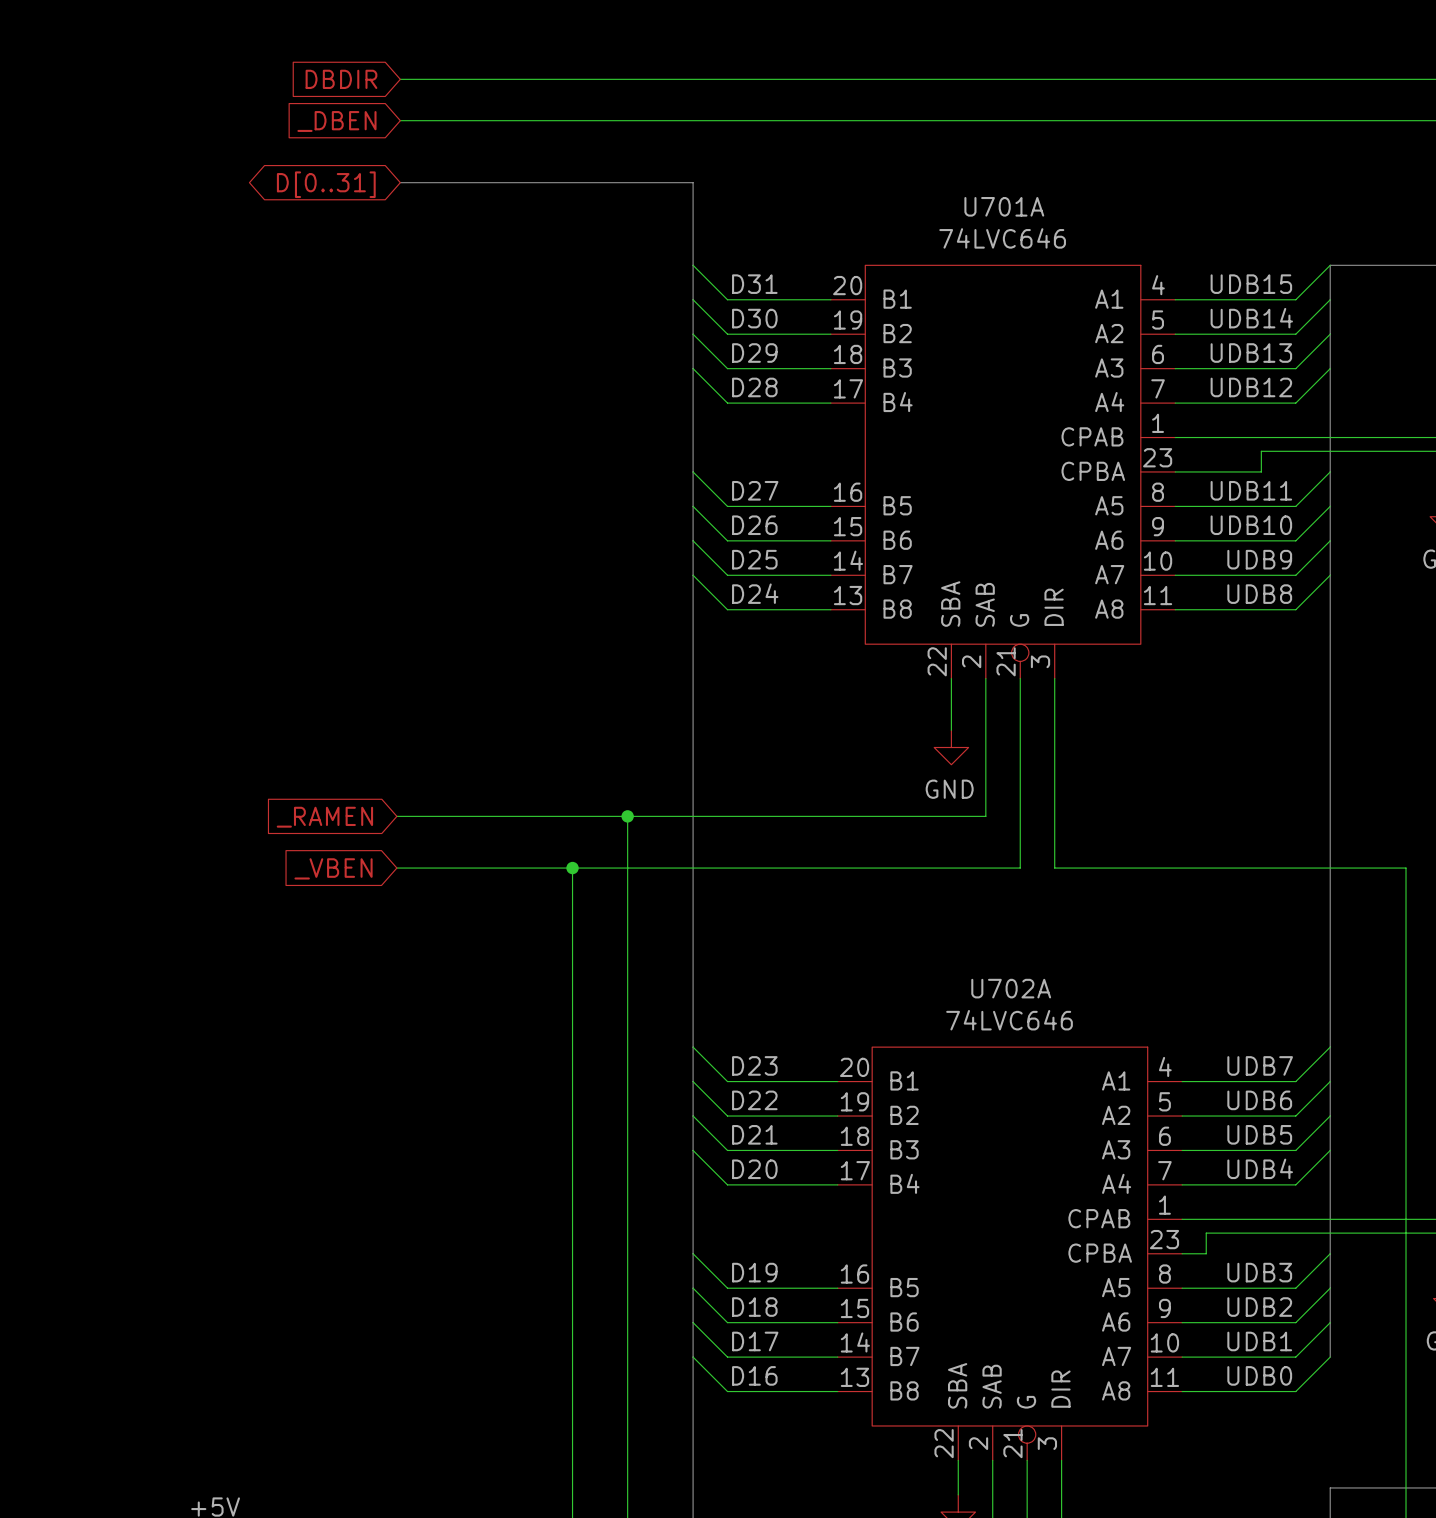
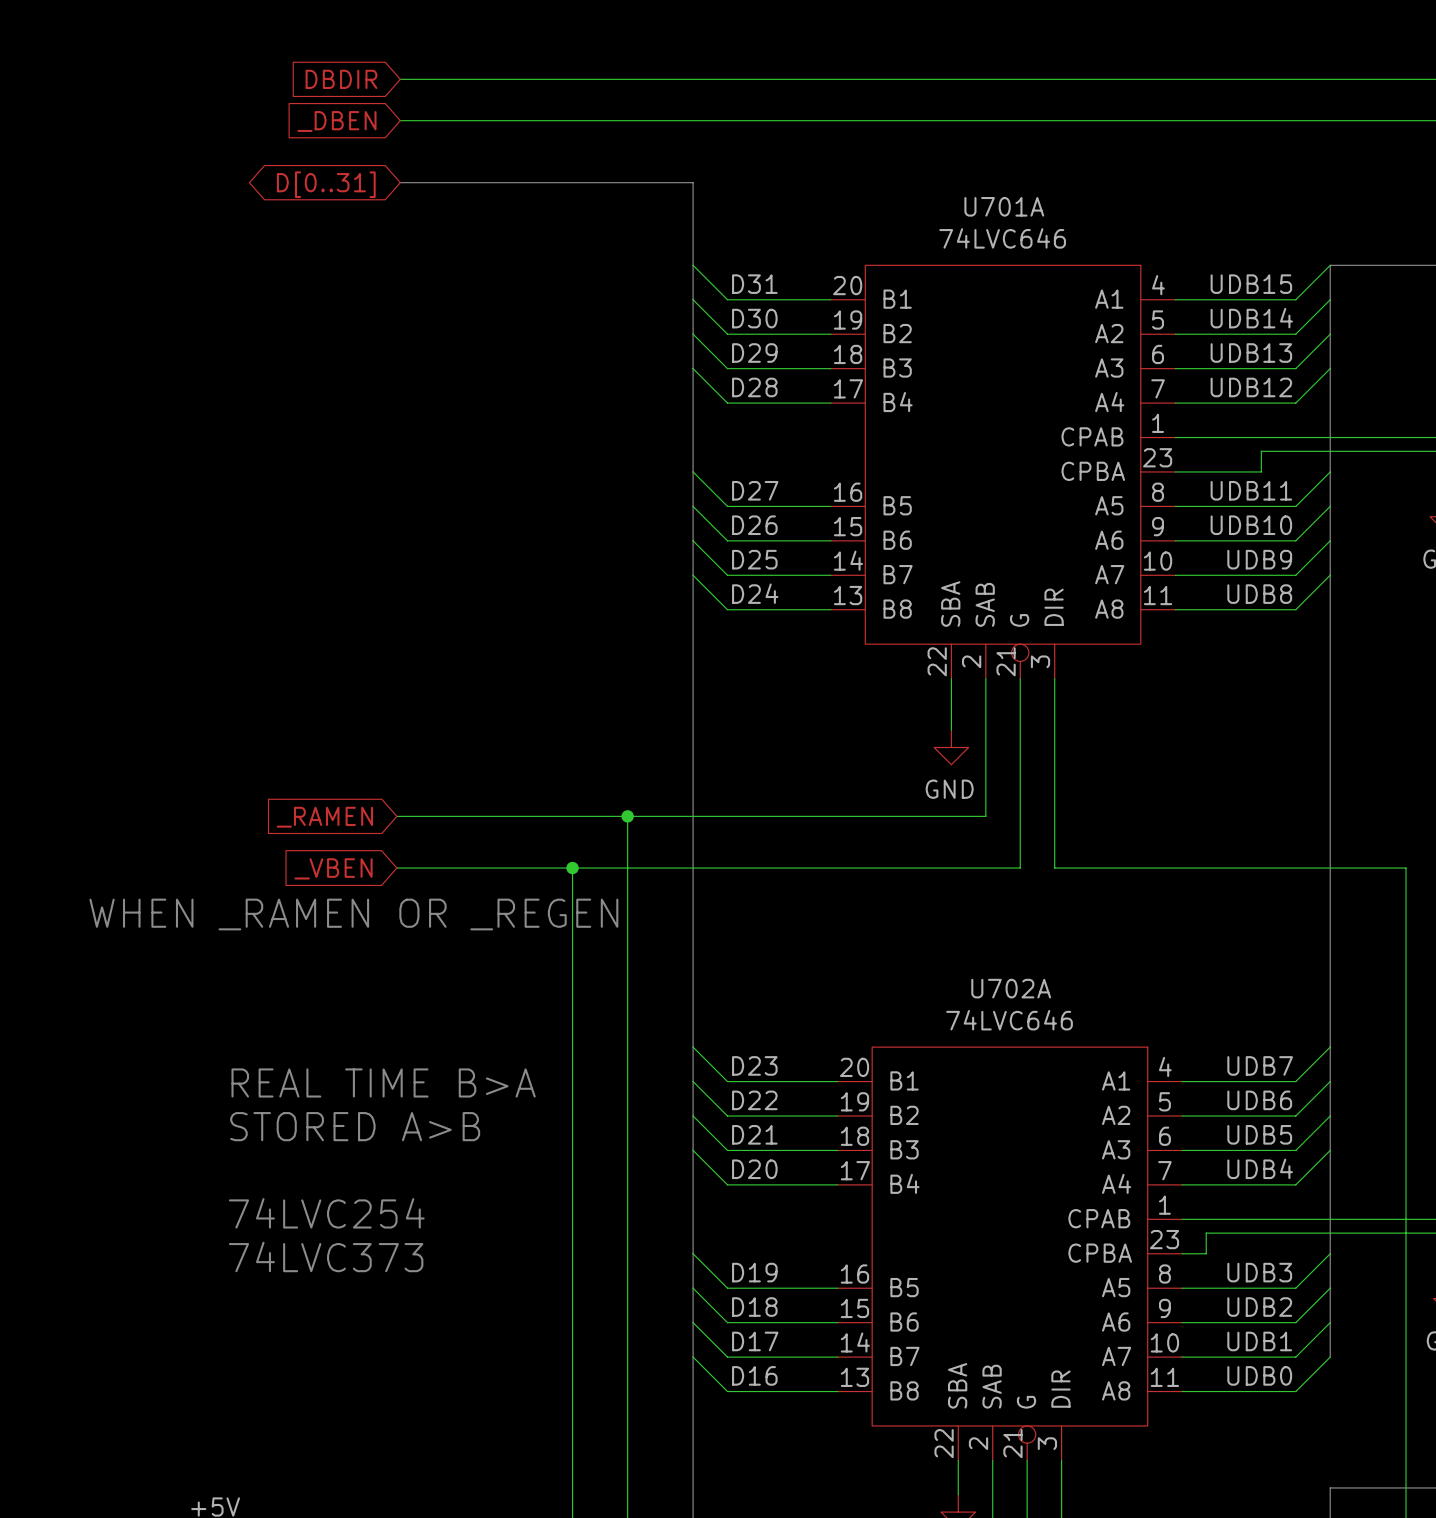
text: none -> WHEN _RAMEN OR _REGEN (353, 914)
text: none -> REAL TIME B>A (383, 1082)
text: none -> STORED A>B (355, 1126)
text: none -> 74LVC254 (326, 1213)
text: none -> 74LVC373 (326, 1256)

